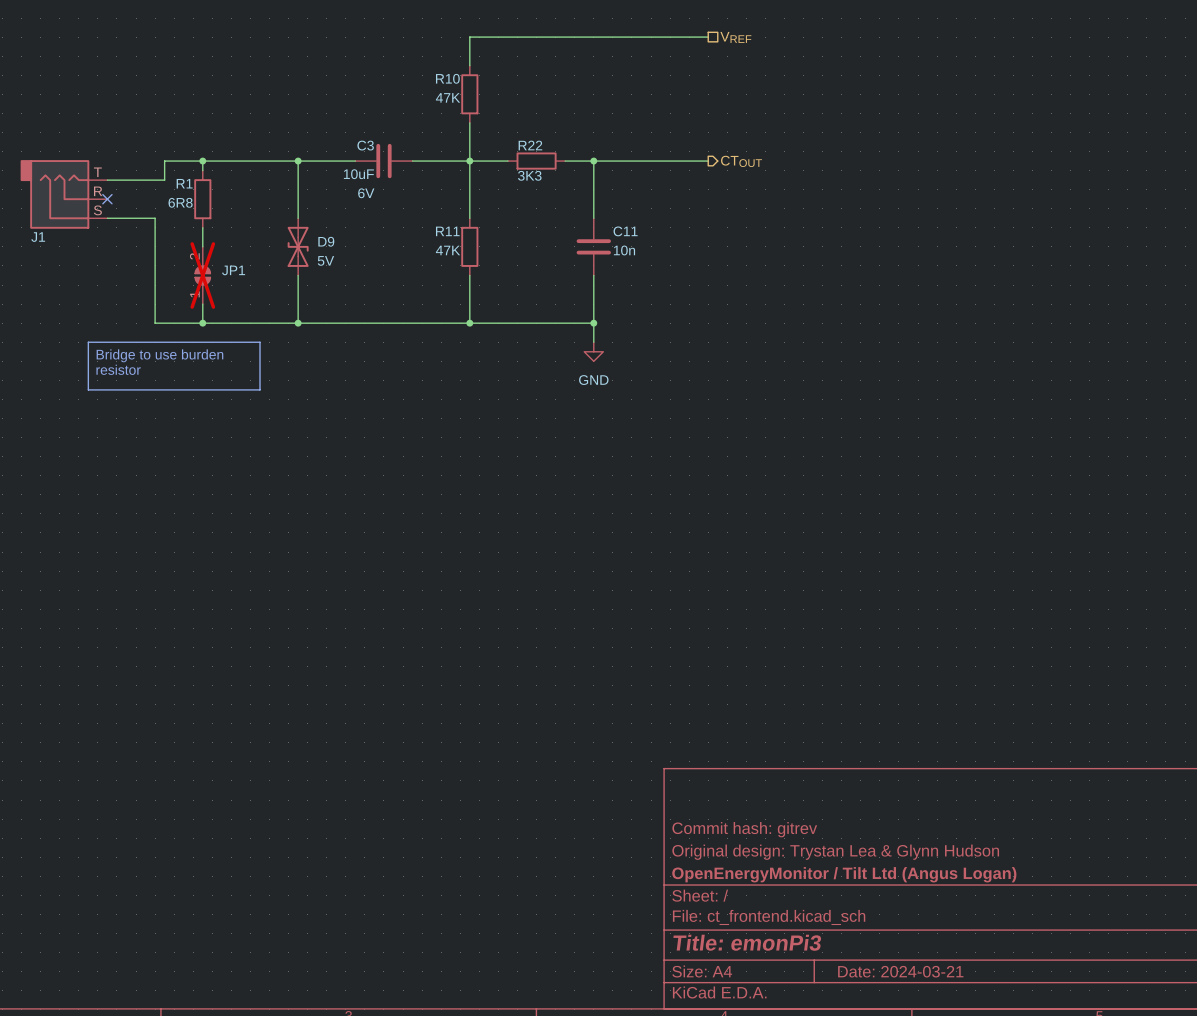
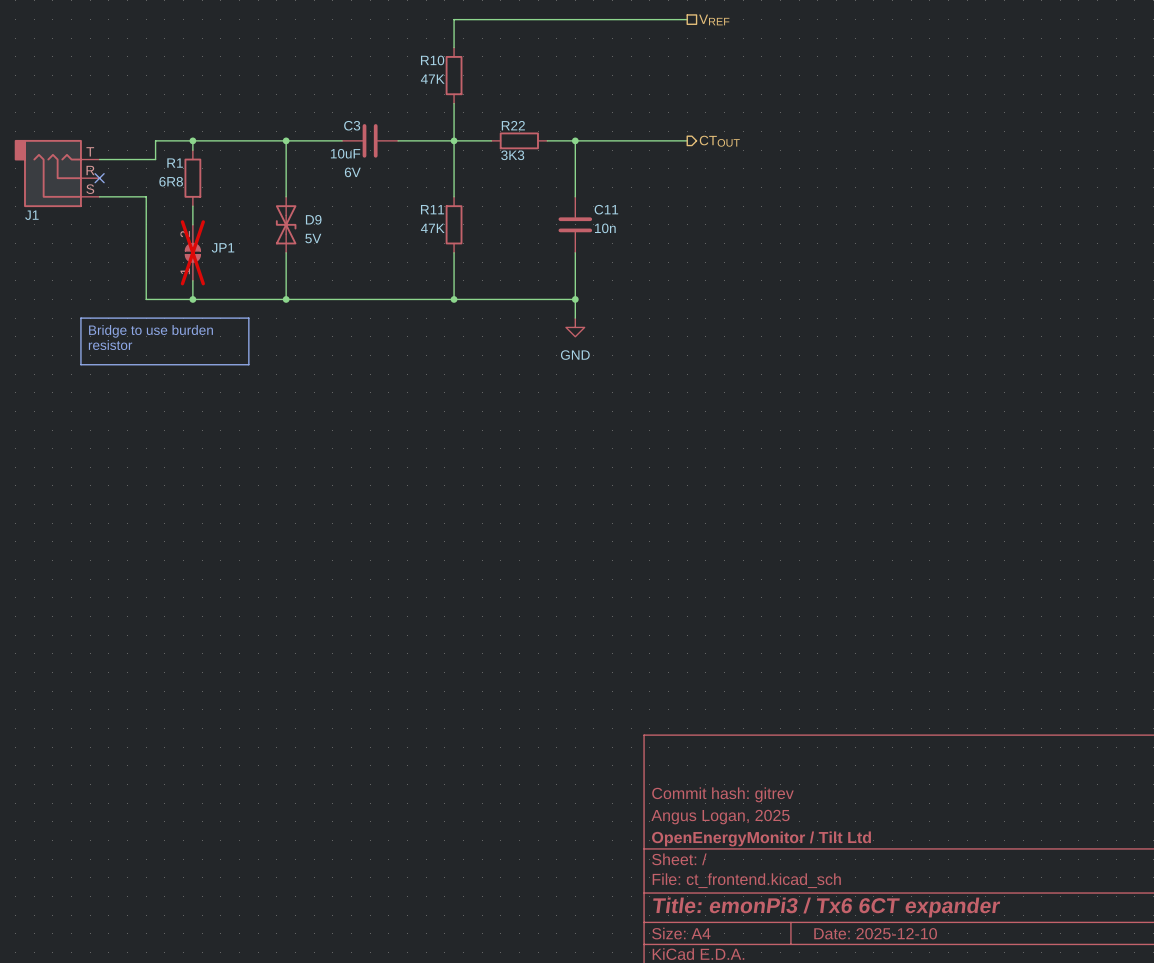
title block: Original design: Trystan Lea & Glynn Hudson (835, 852) -> Angus Logan, 2025 (720, 817)
title block: OpenEnergyMonitor / Tilt Ltd (Angus Logan) (844, 874) -> OpenEnergyMonitor / Tilt Ltd (761, 838)
title block: Title: emonPi3 (747, 942) -> Title: emonPi3 / Tx6 6CT expander (826, 907)
title block: Date: 2024-03-21 (900, 971) -> Date: 2025-12-10 (875, 933)

